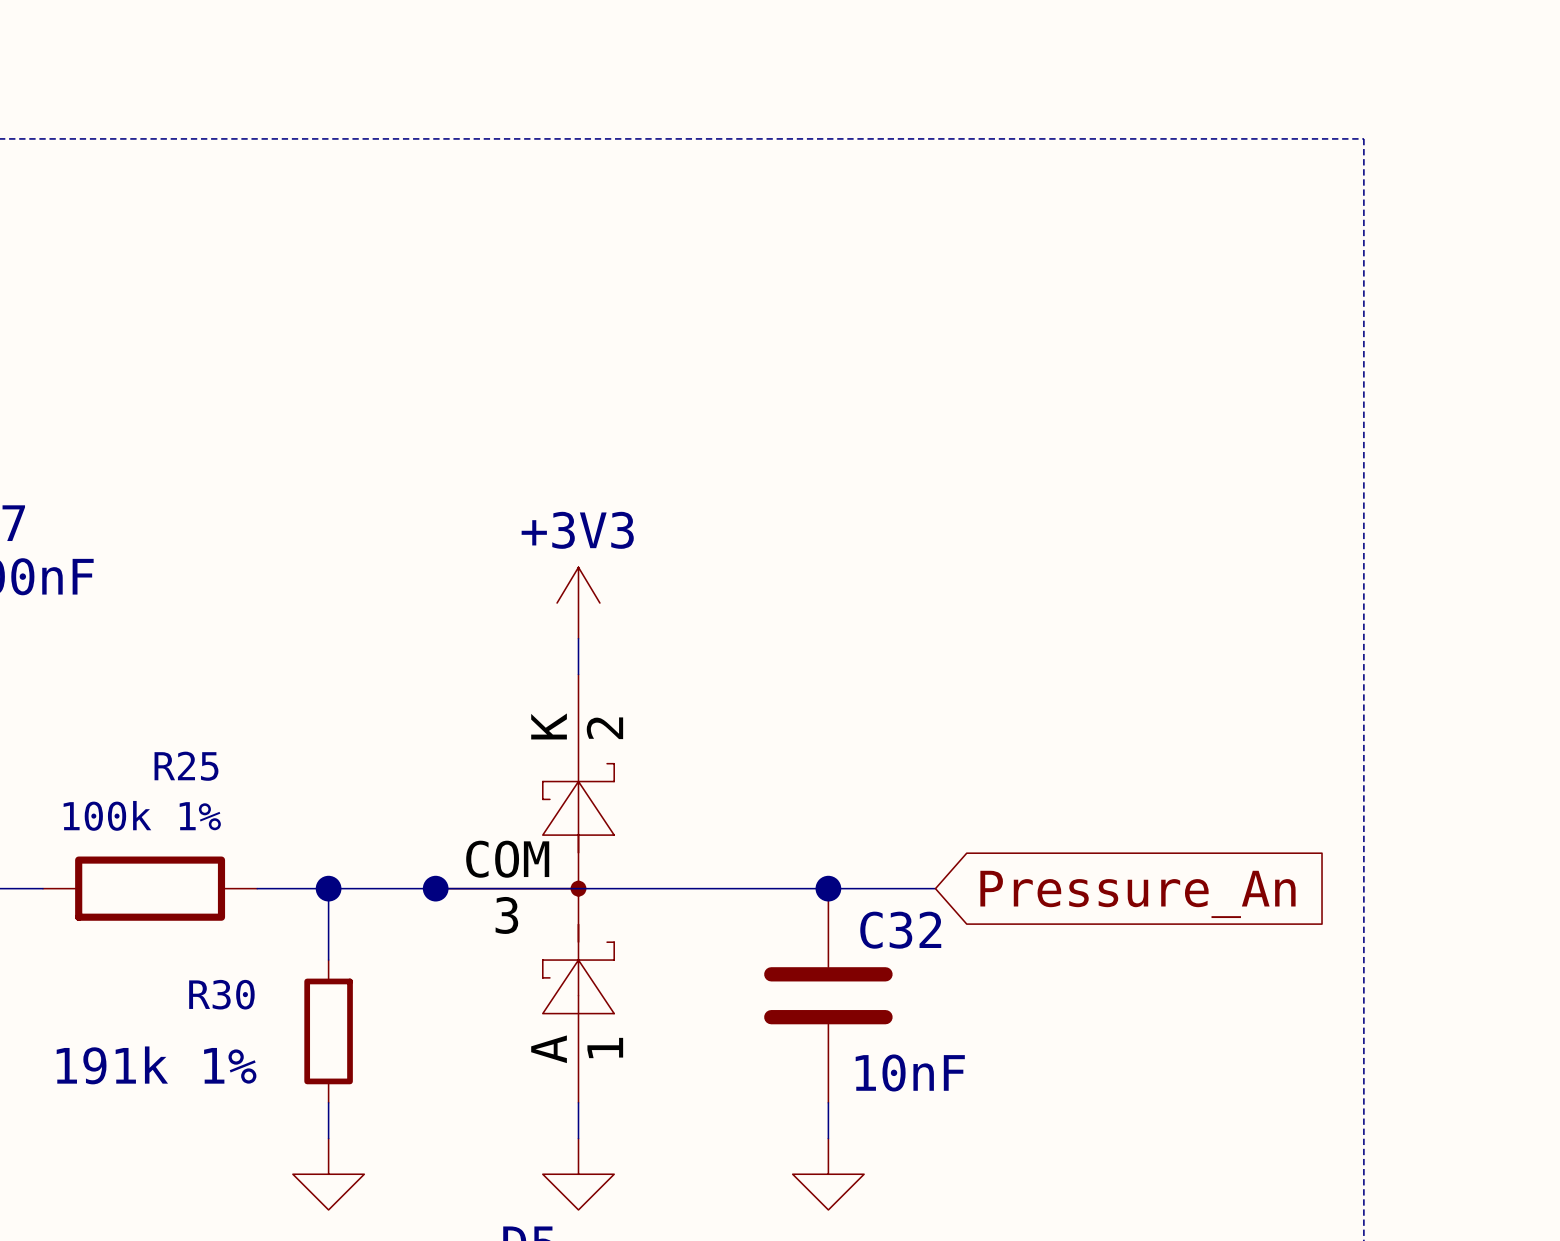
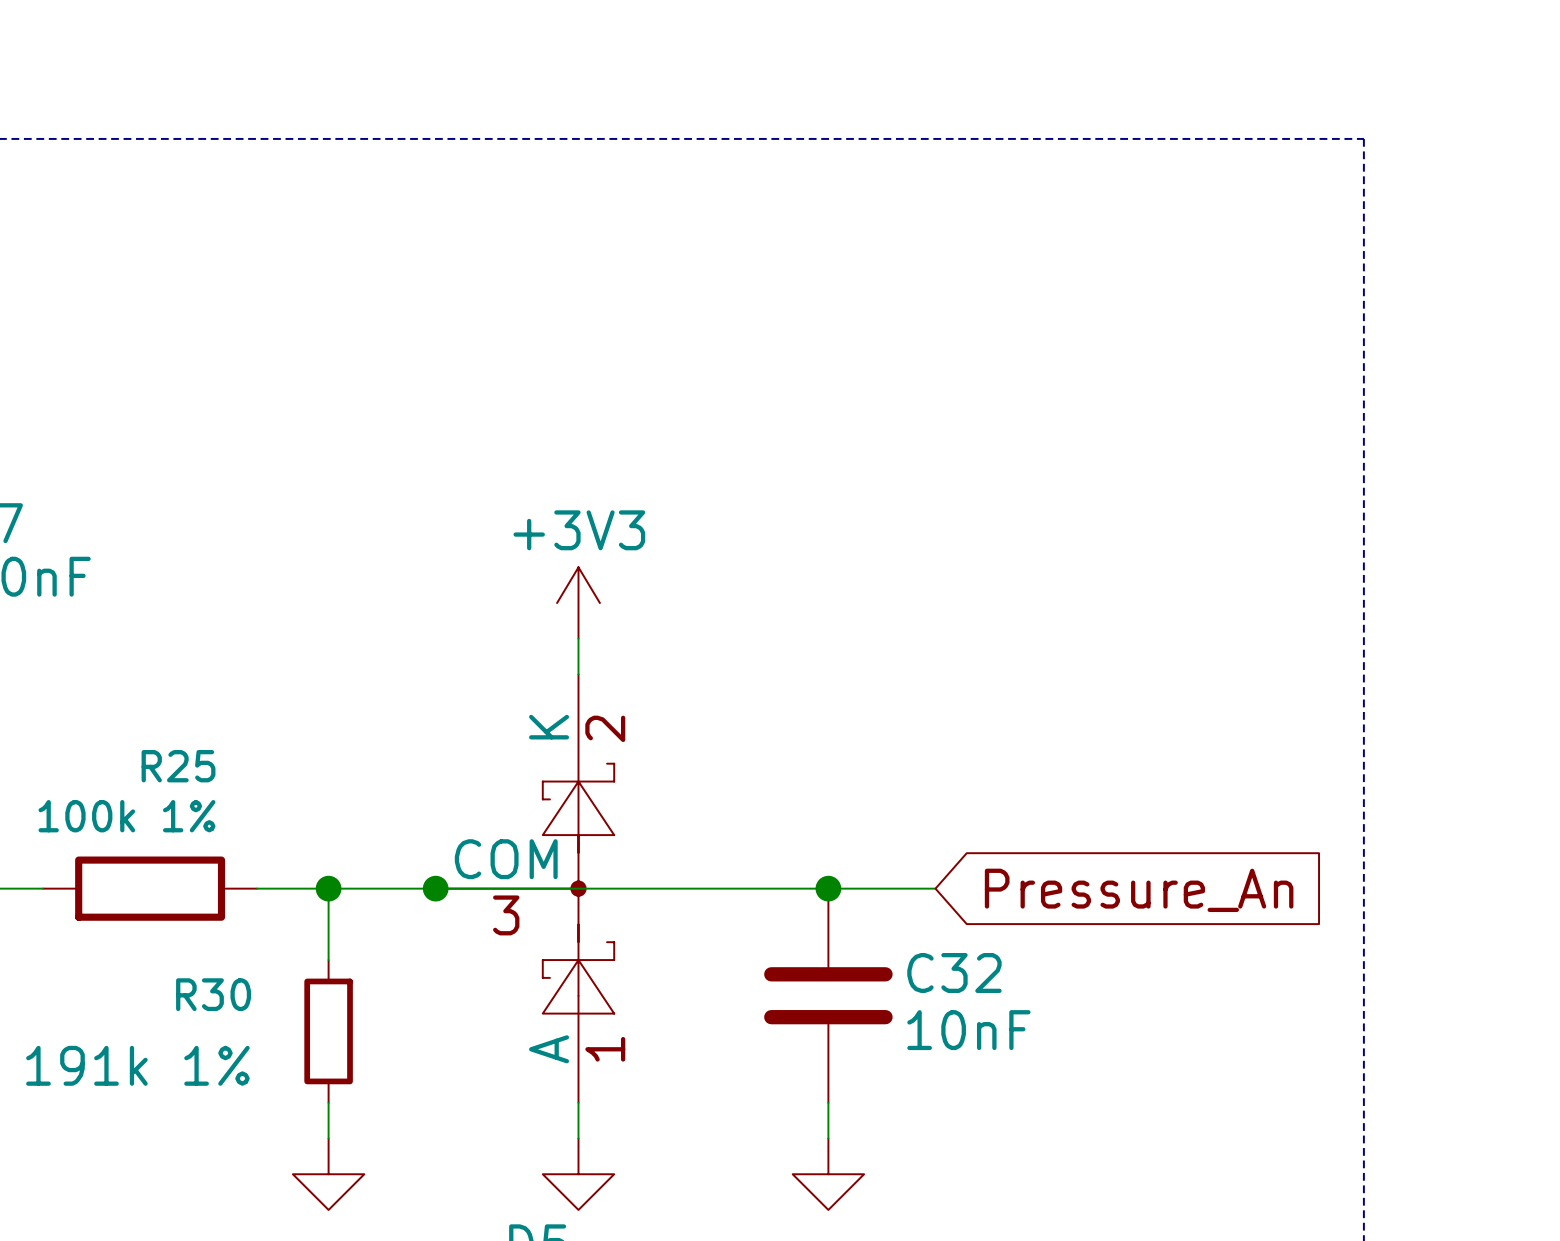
C32 name position: C32 (900, 930) -> C32 (954, 972)
C32 value position: 10nF (910, 1072) -> 10nF (968, 1030)

